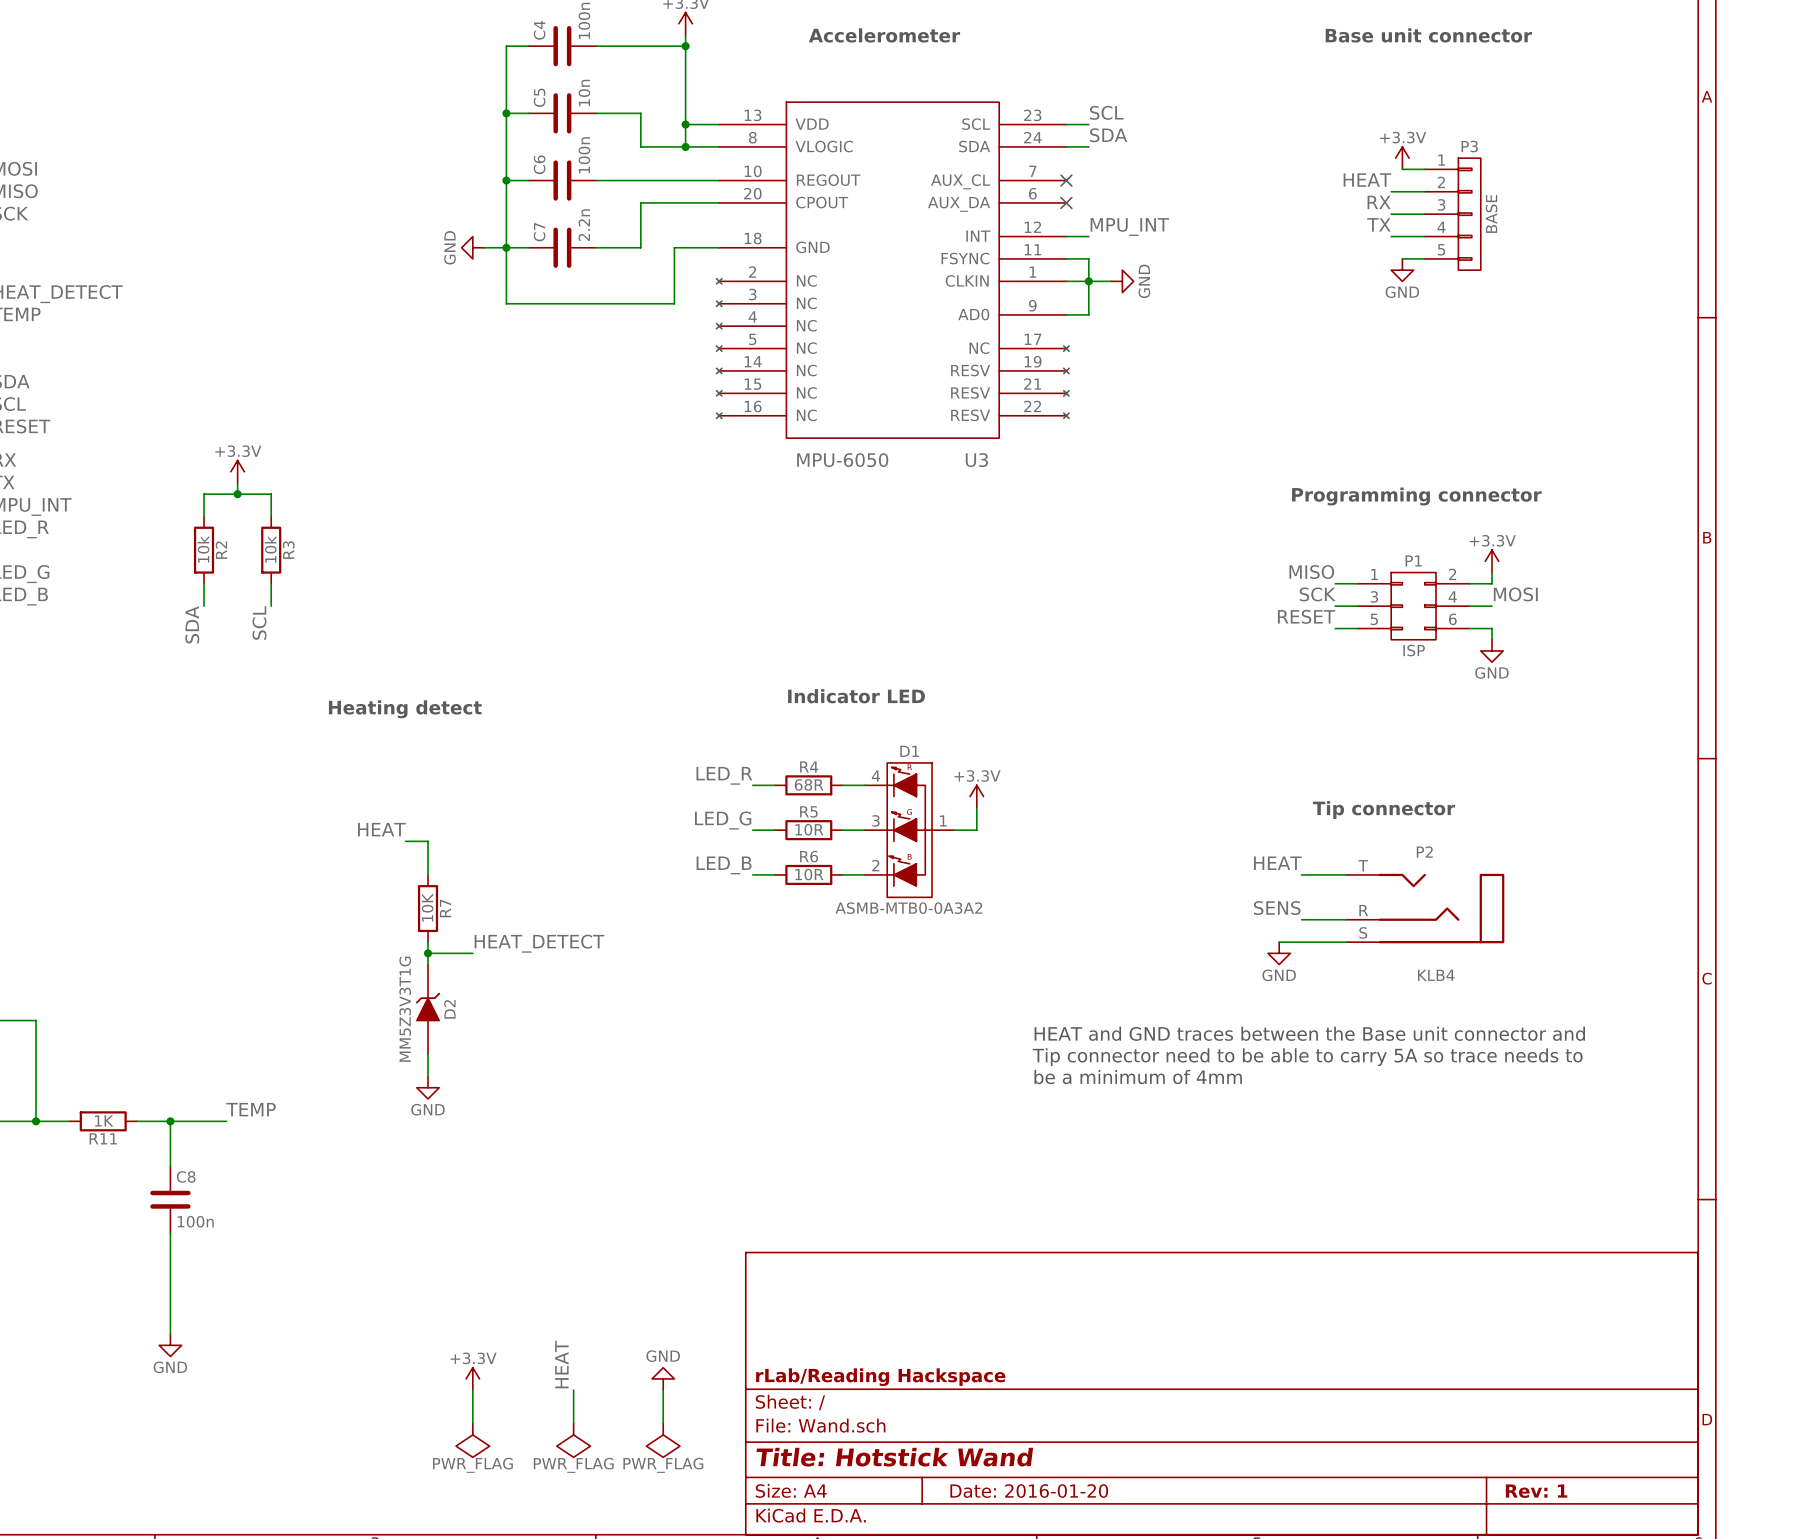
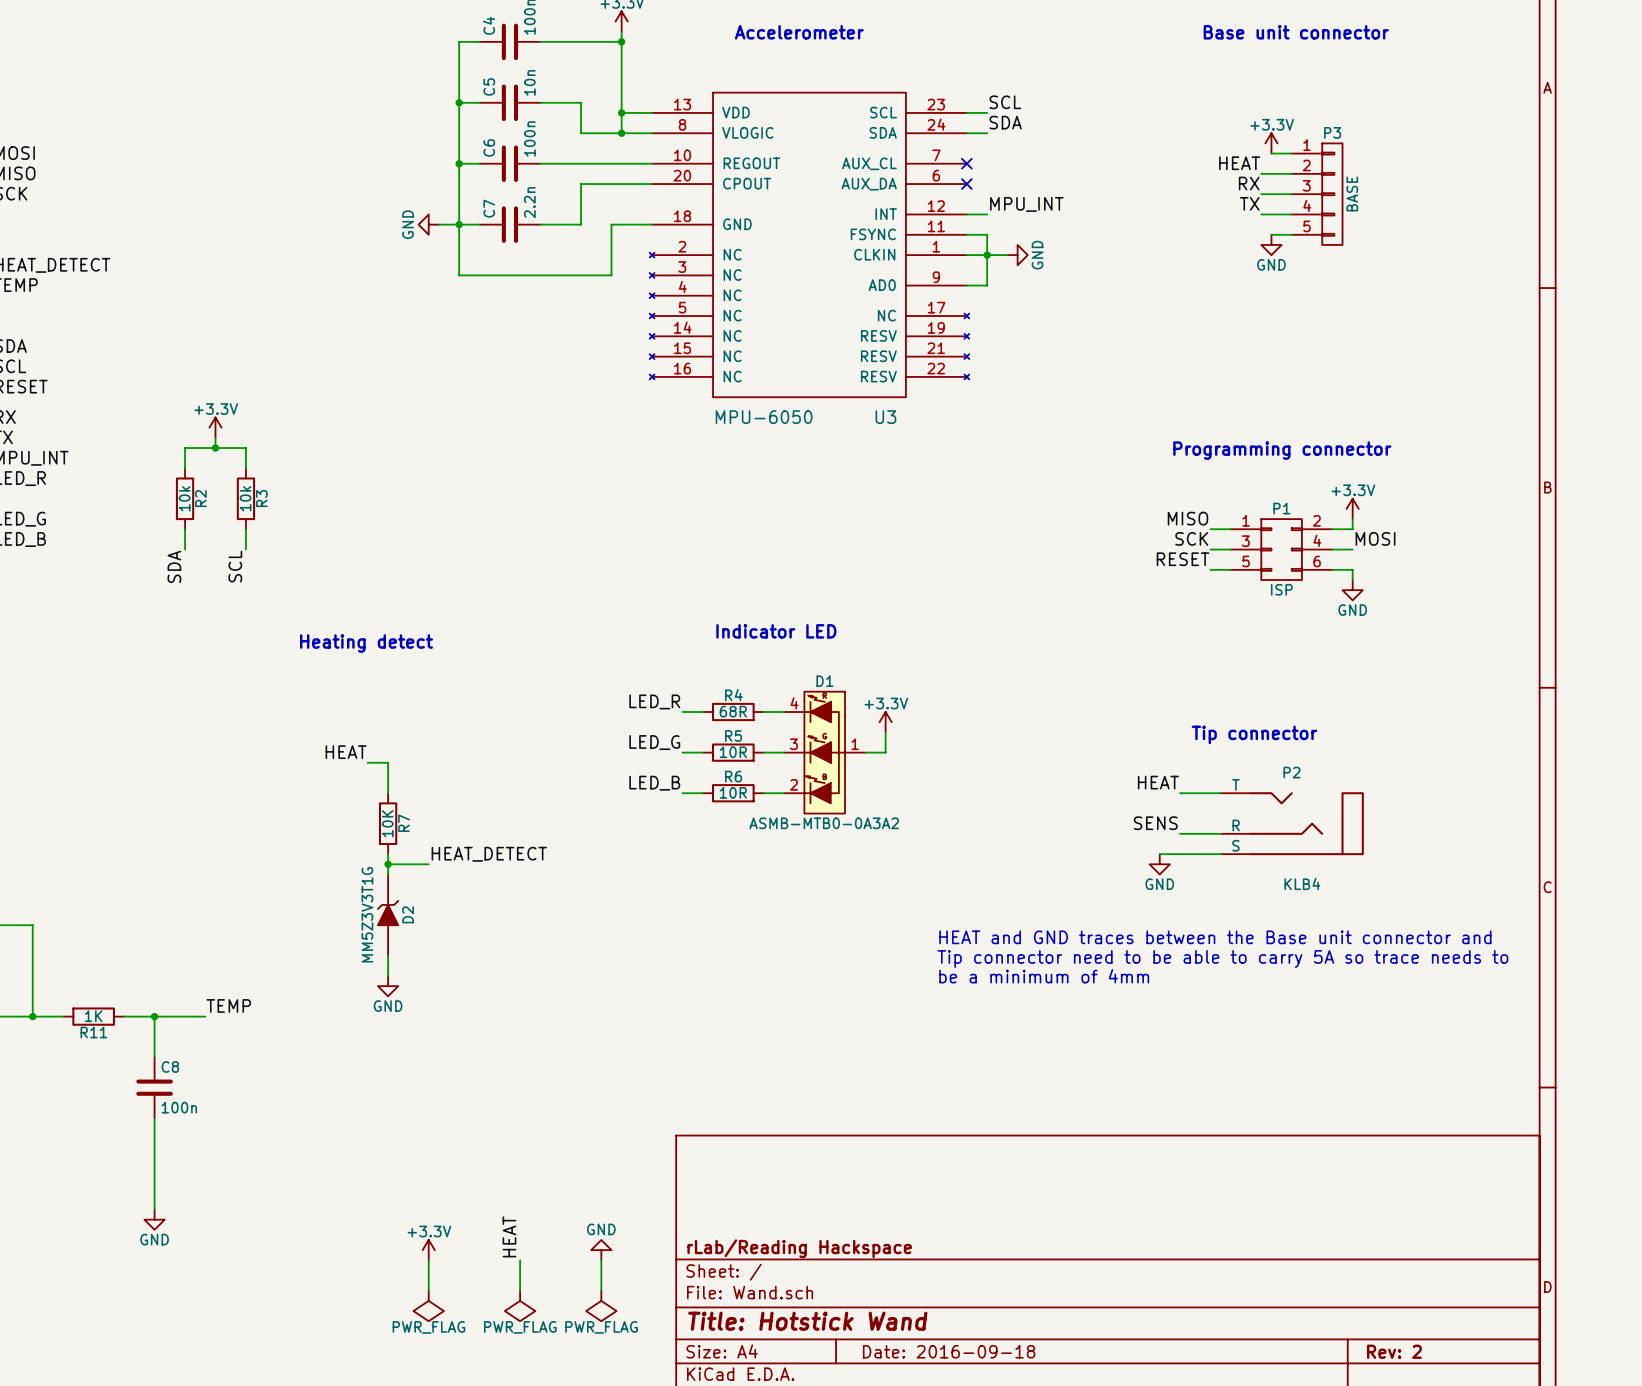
title block: Date: 2016-01-20 (1029, 1491) -> Date: 2016-09-18 (949, 1351)
title block: Rev: 1 (1536, 1491) -> Rev: 2 (1394, 1351)

